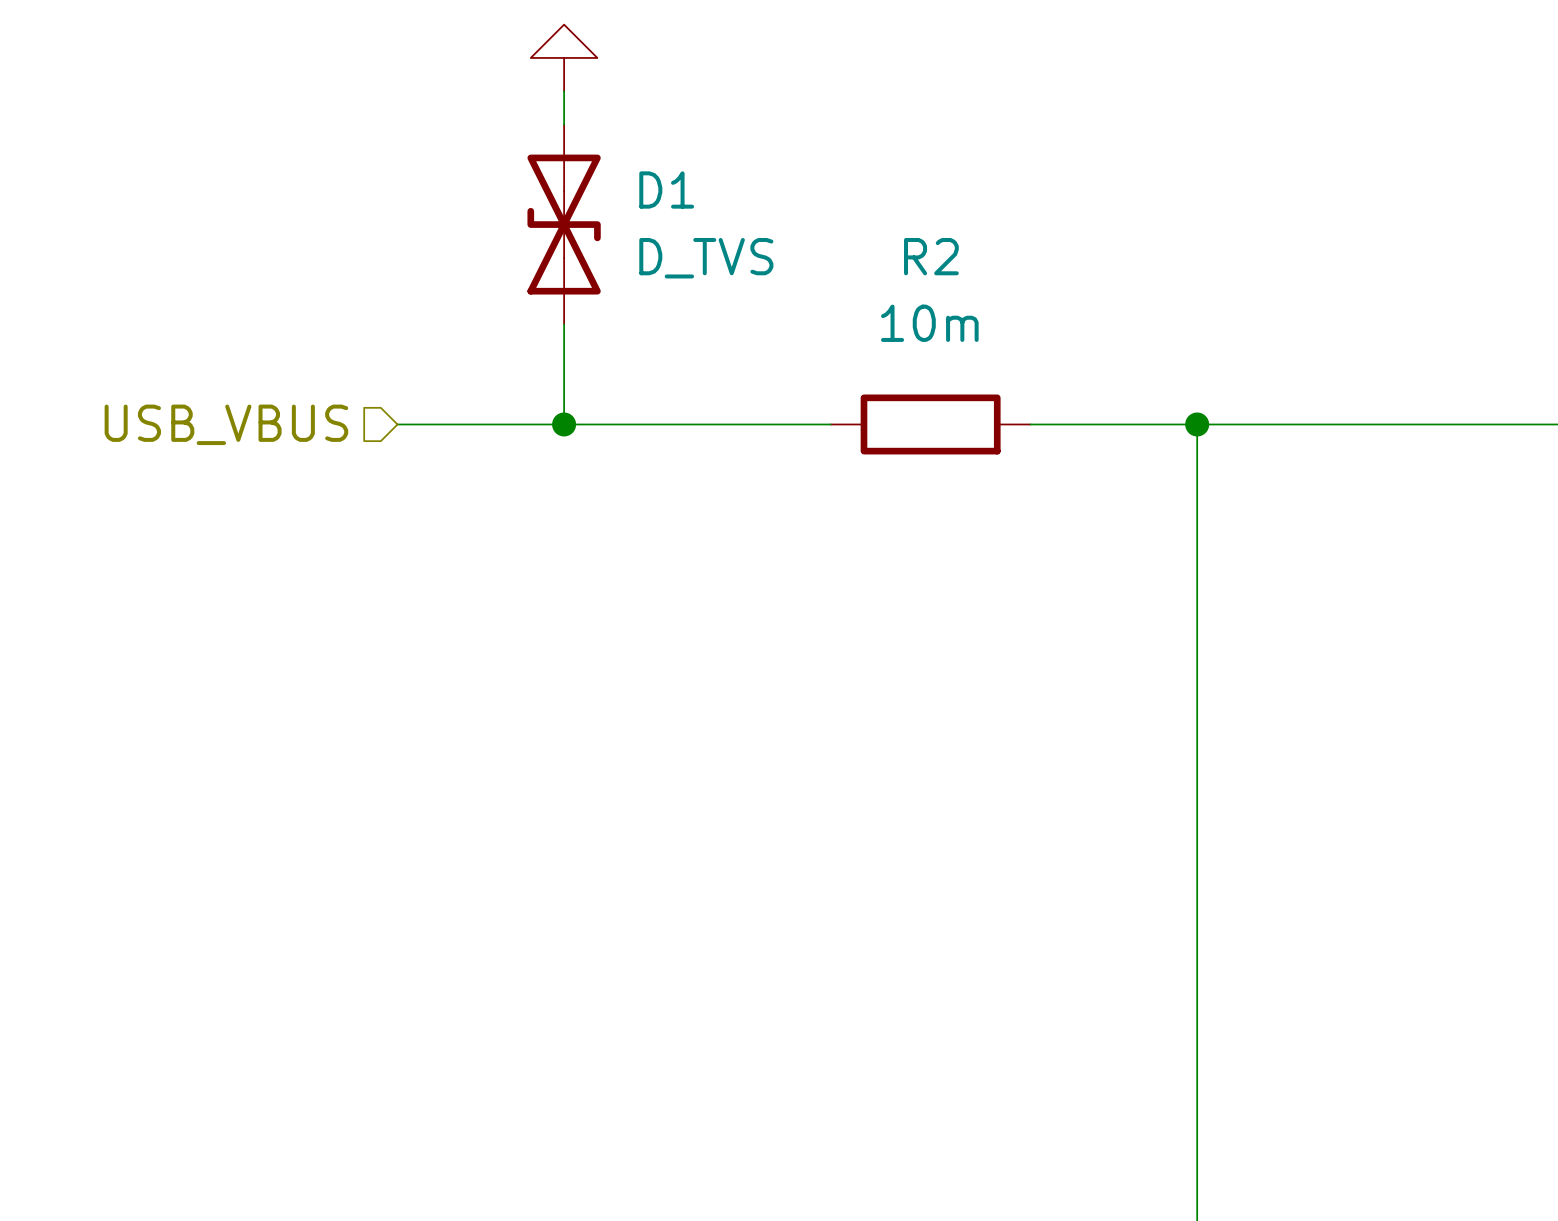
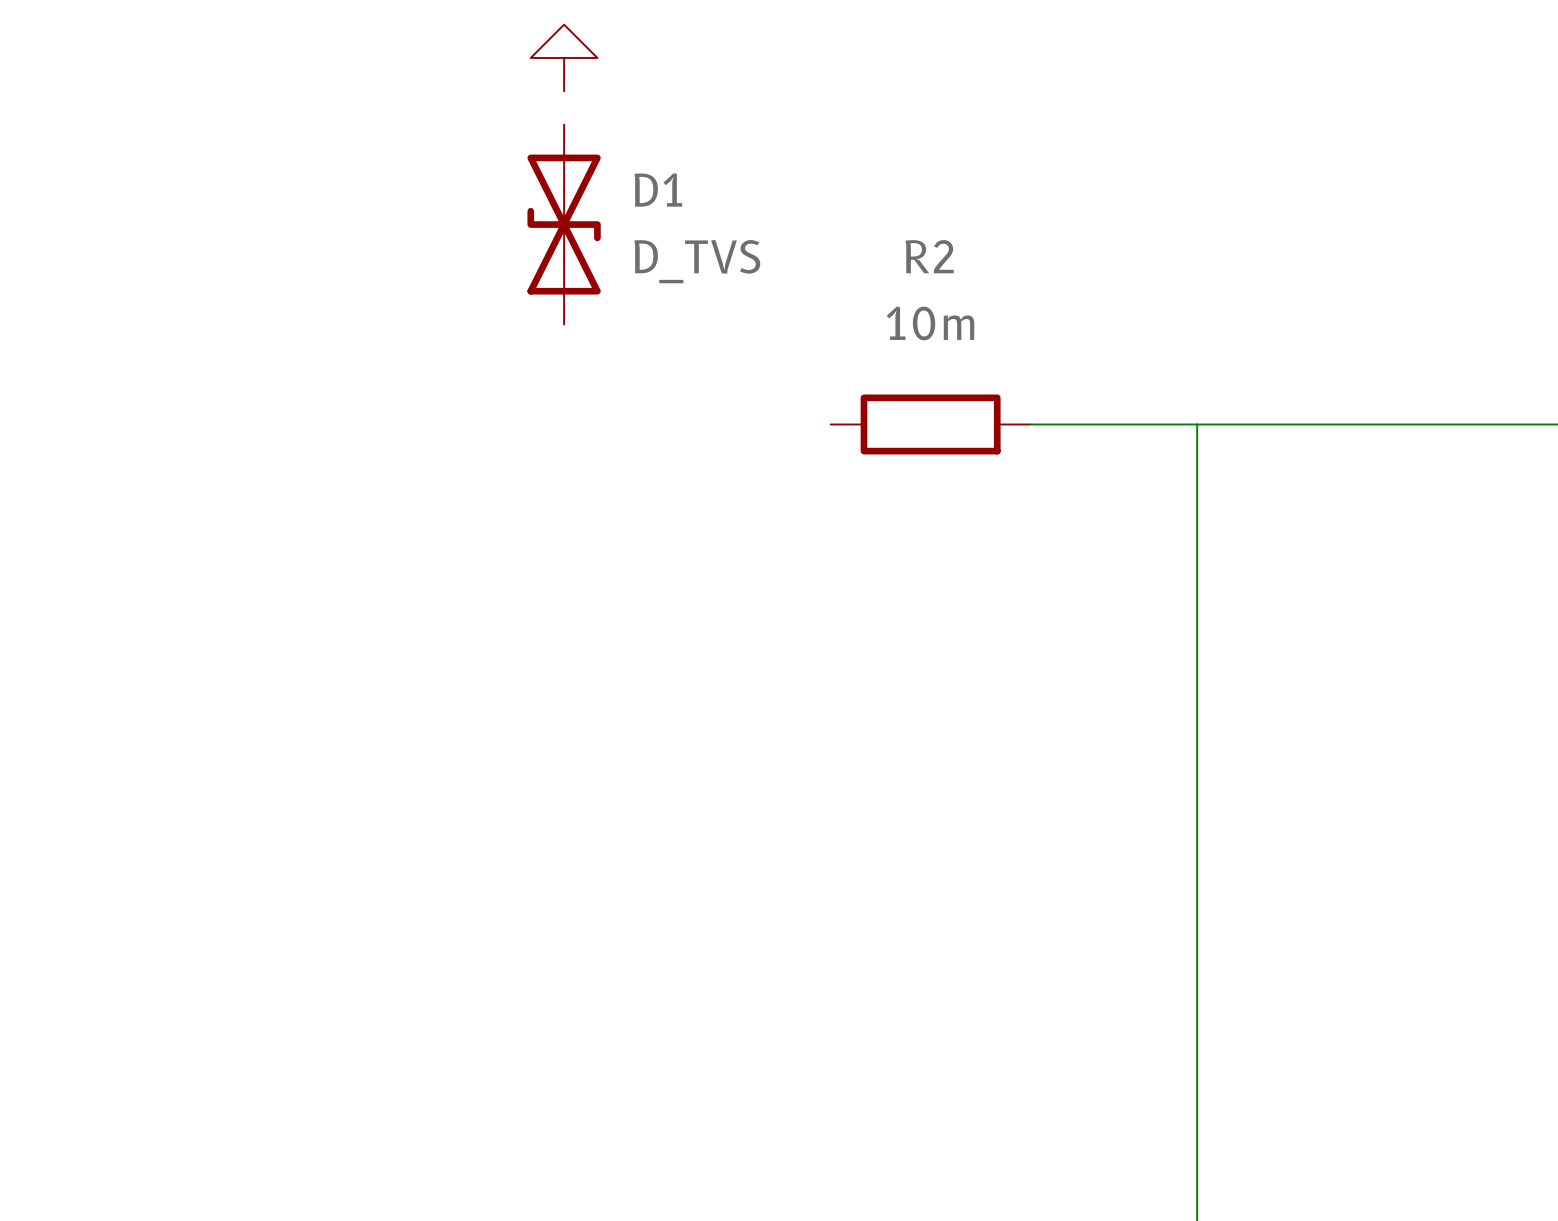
wire: (564, 91) (564, 124) -> none
wire: (564, 324) (564, 424) -> none
hierarchical label: USB_VBUS (226, 424) -> none
wire: (397, 424) (830, 424) -> none
junction: (564, 424) -> none
junction: (1197, 424) -> none

